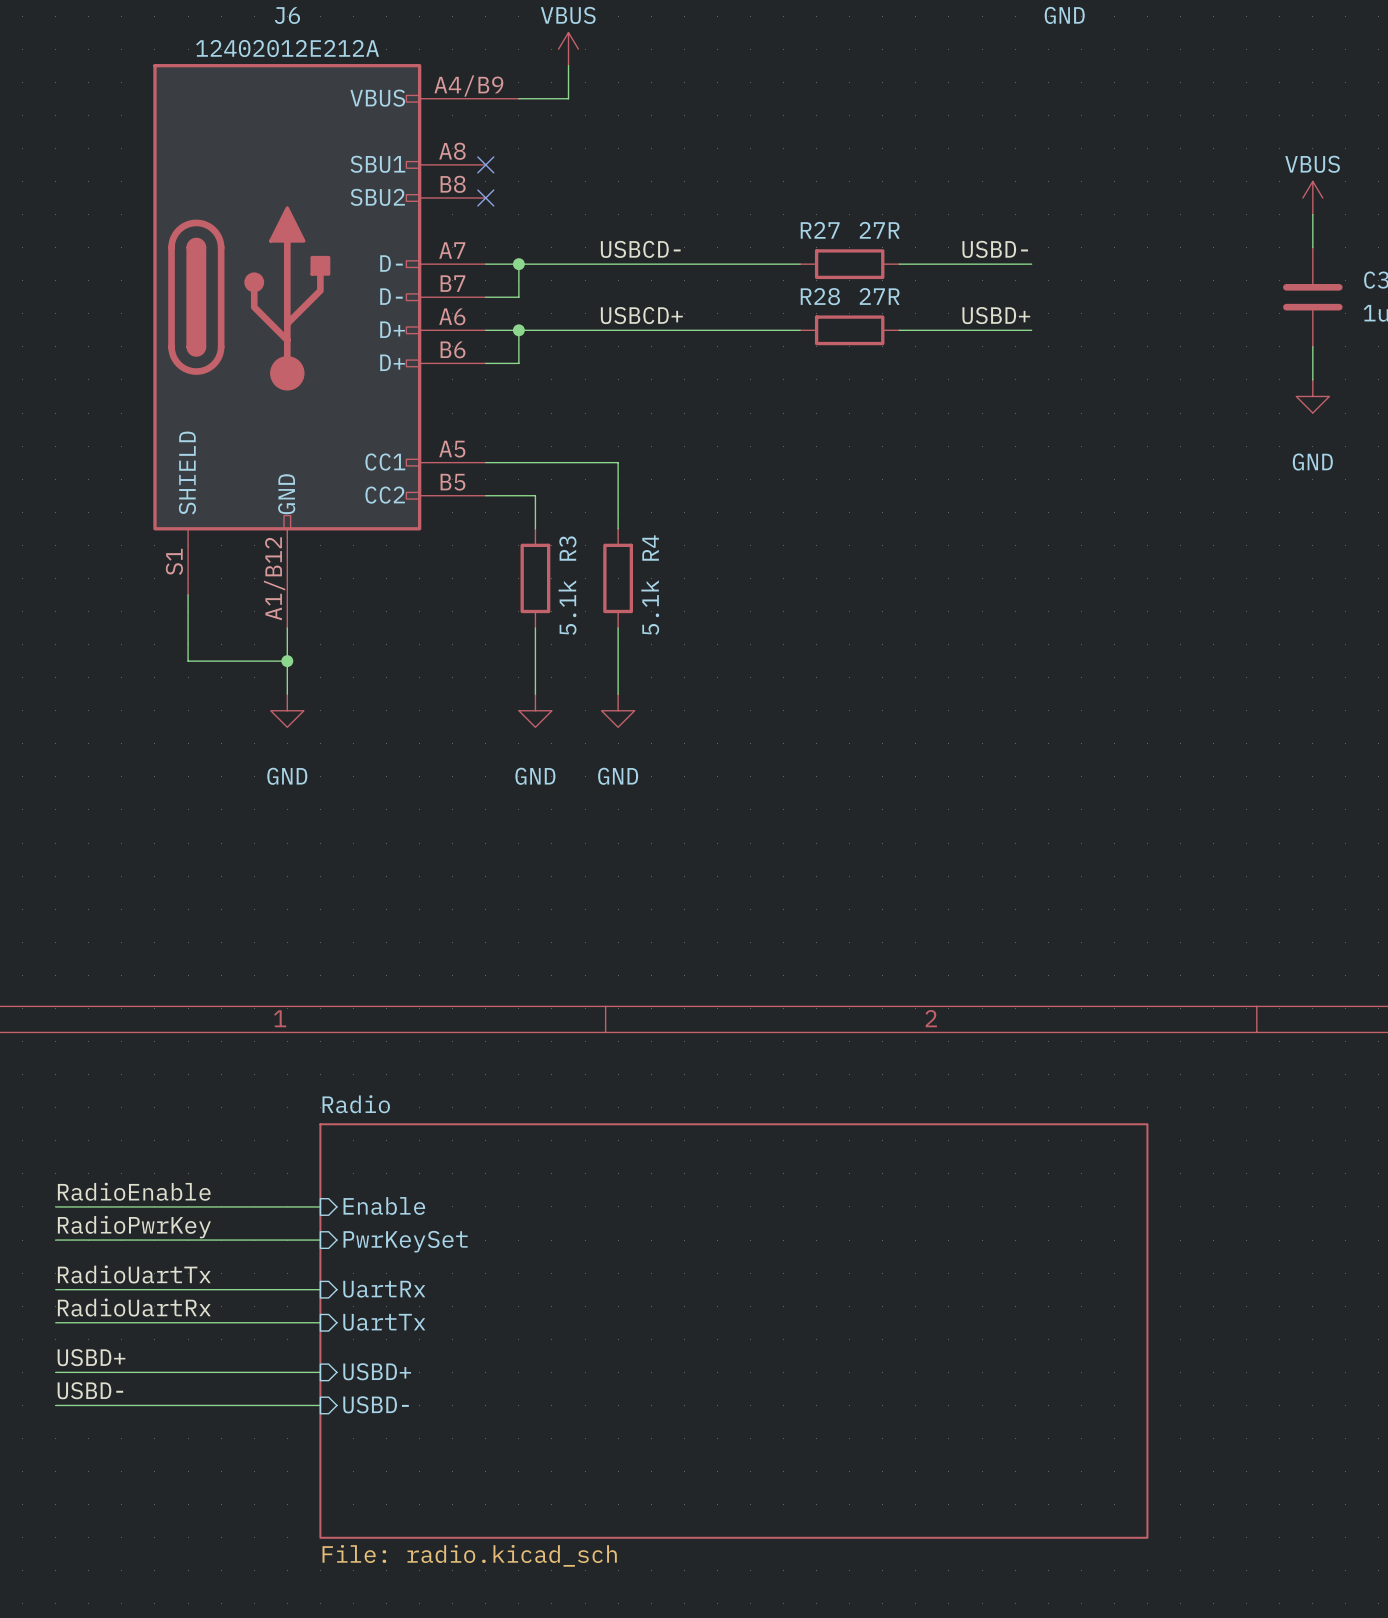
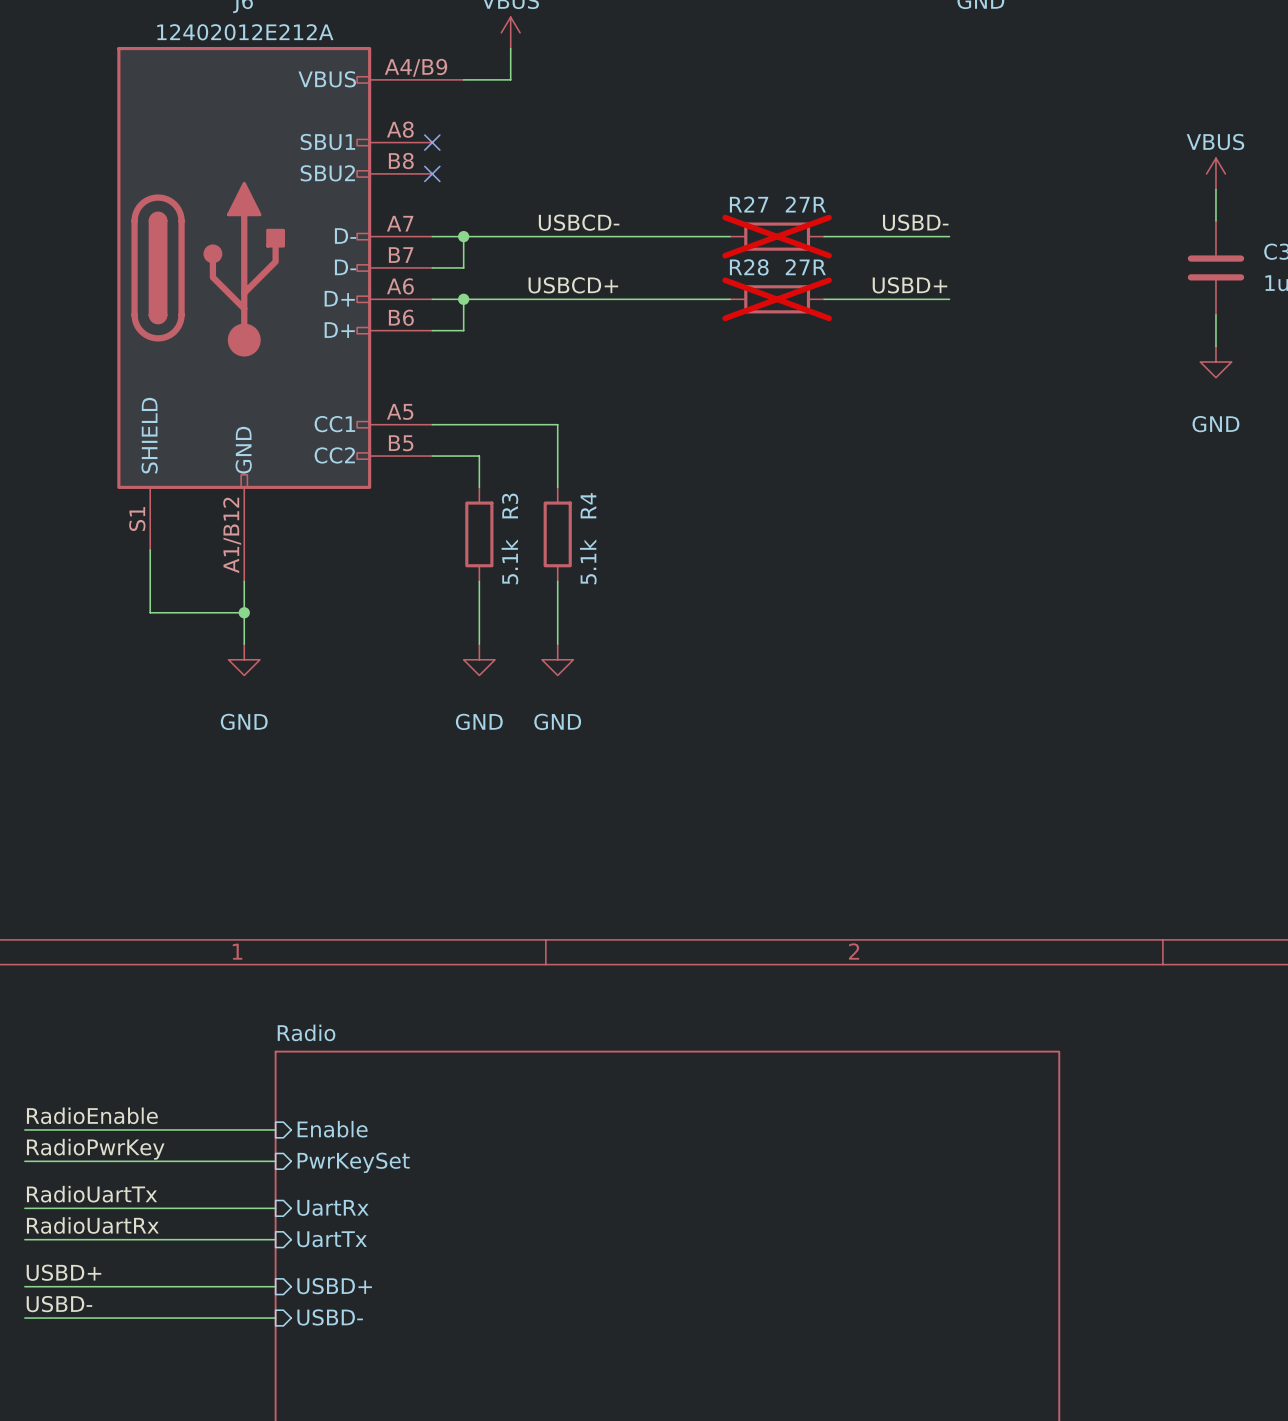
R27 do-not-place cross: none -> (777, 236)
R28 do-not-place cross: none -> (777, 299)

